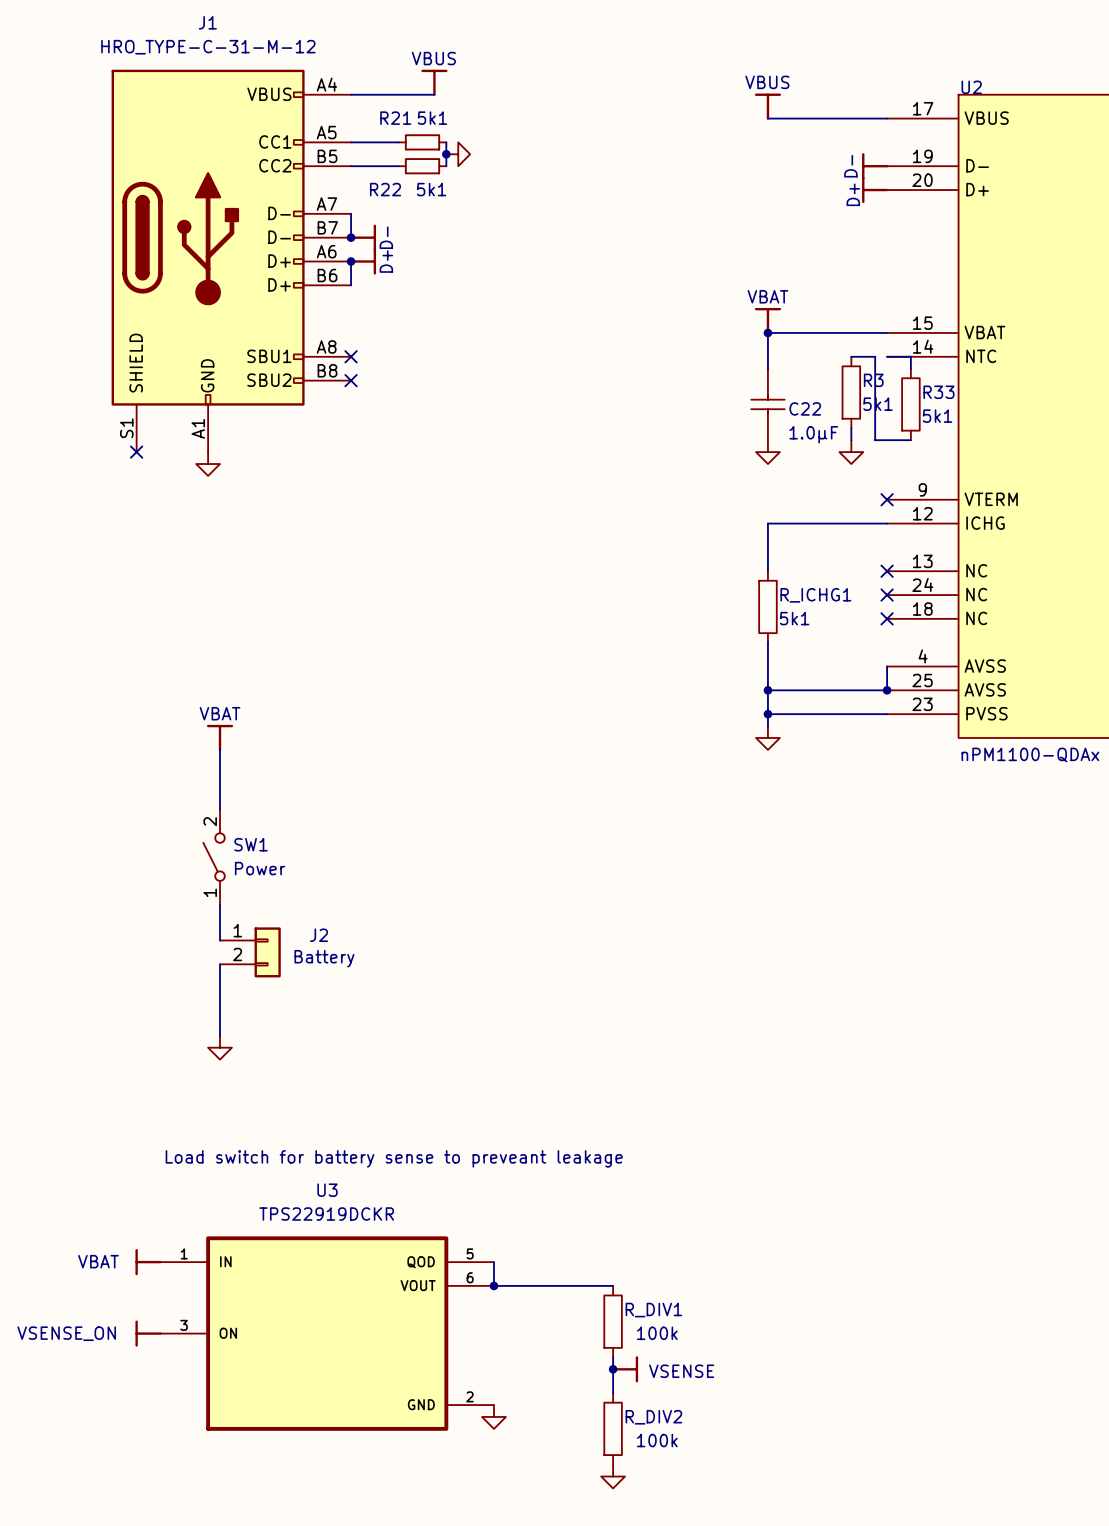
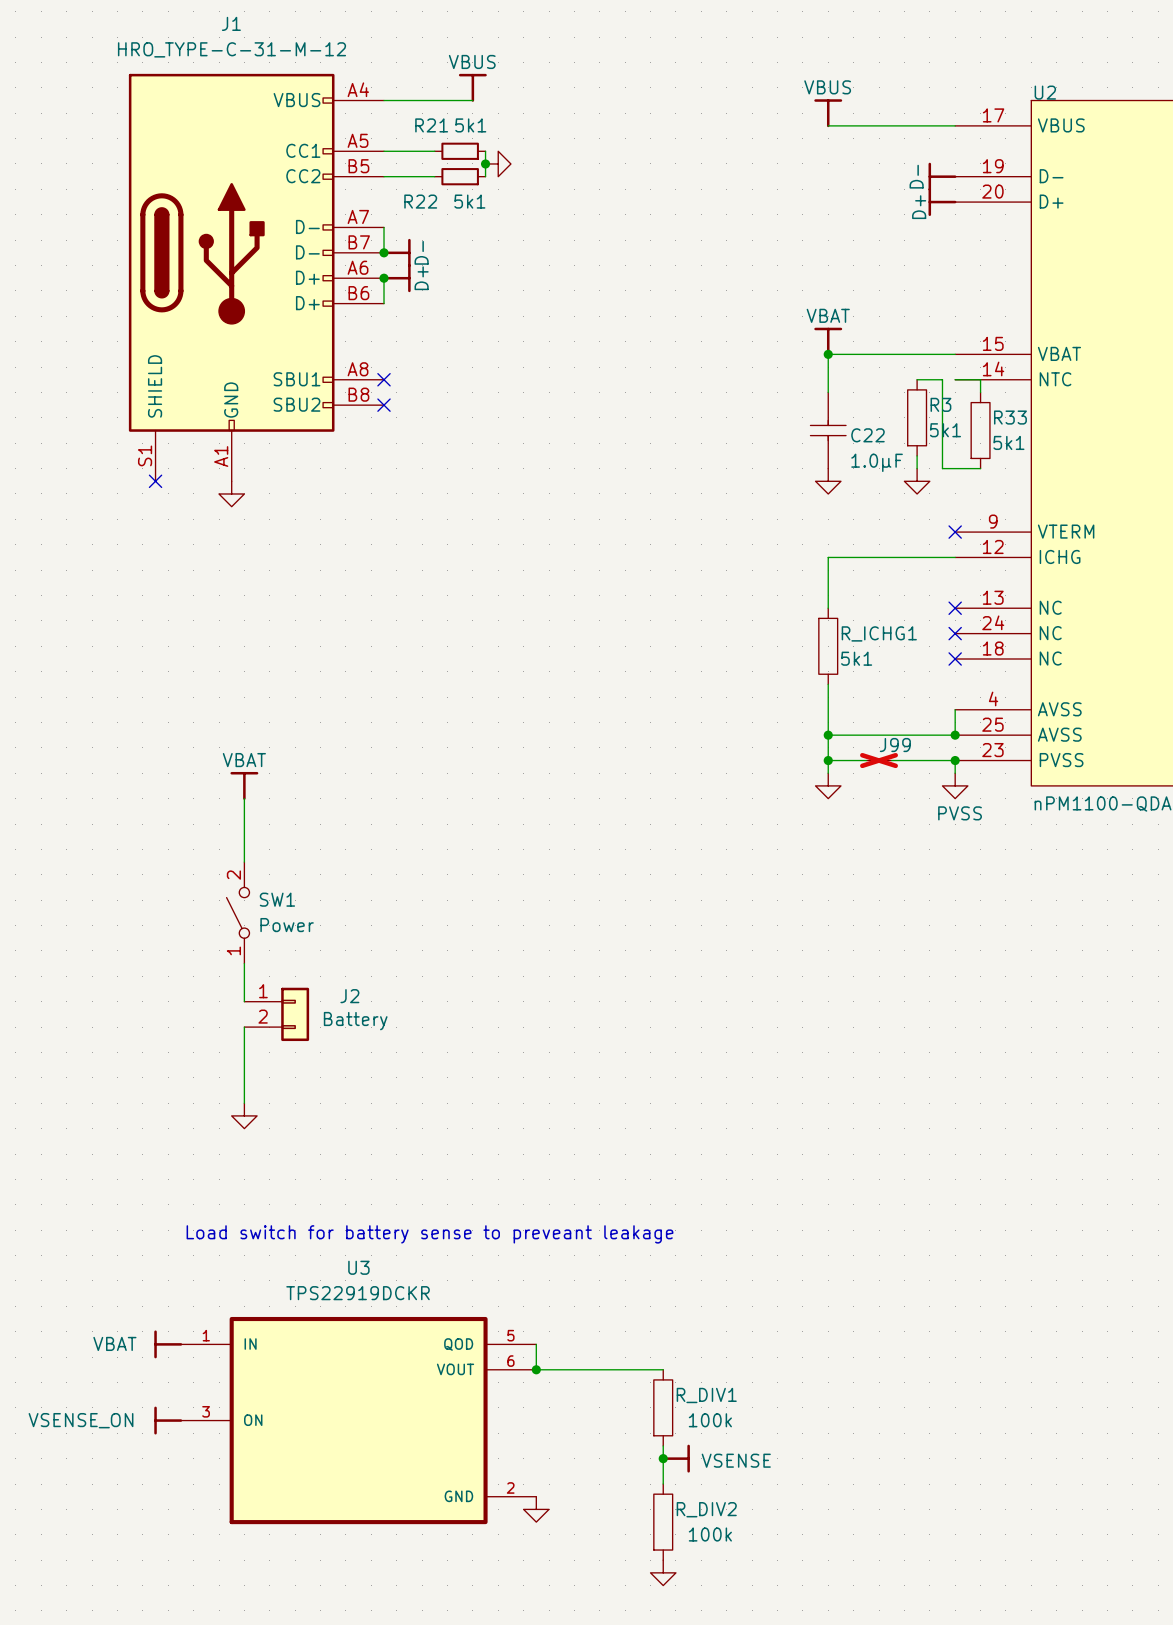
J99: none -> (879, 760)
wire: none -> (955, 760) (955, 773)
junction: none -> (955, 760)
power symbol: none -> PVSS (955, 785)

